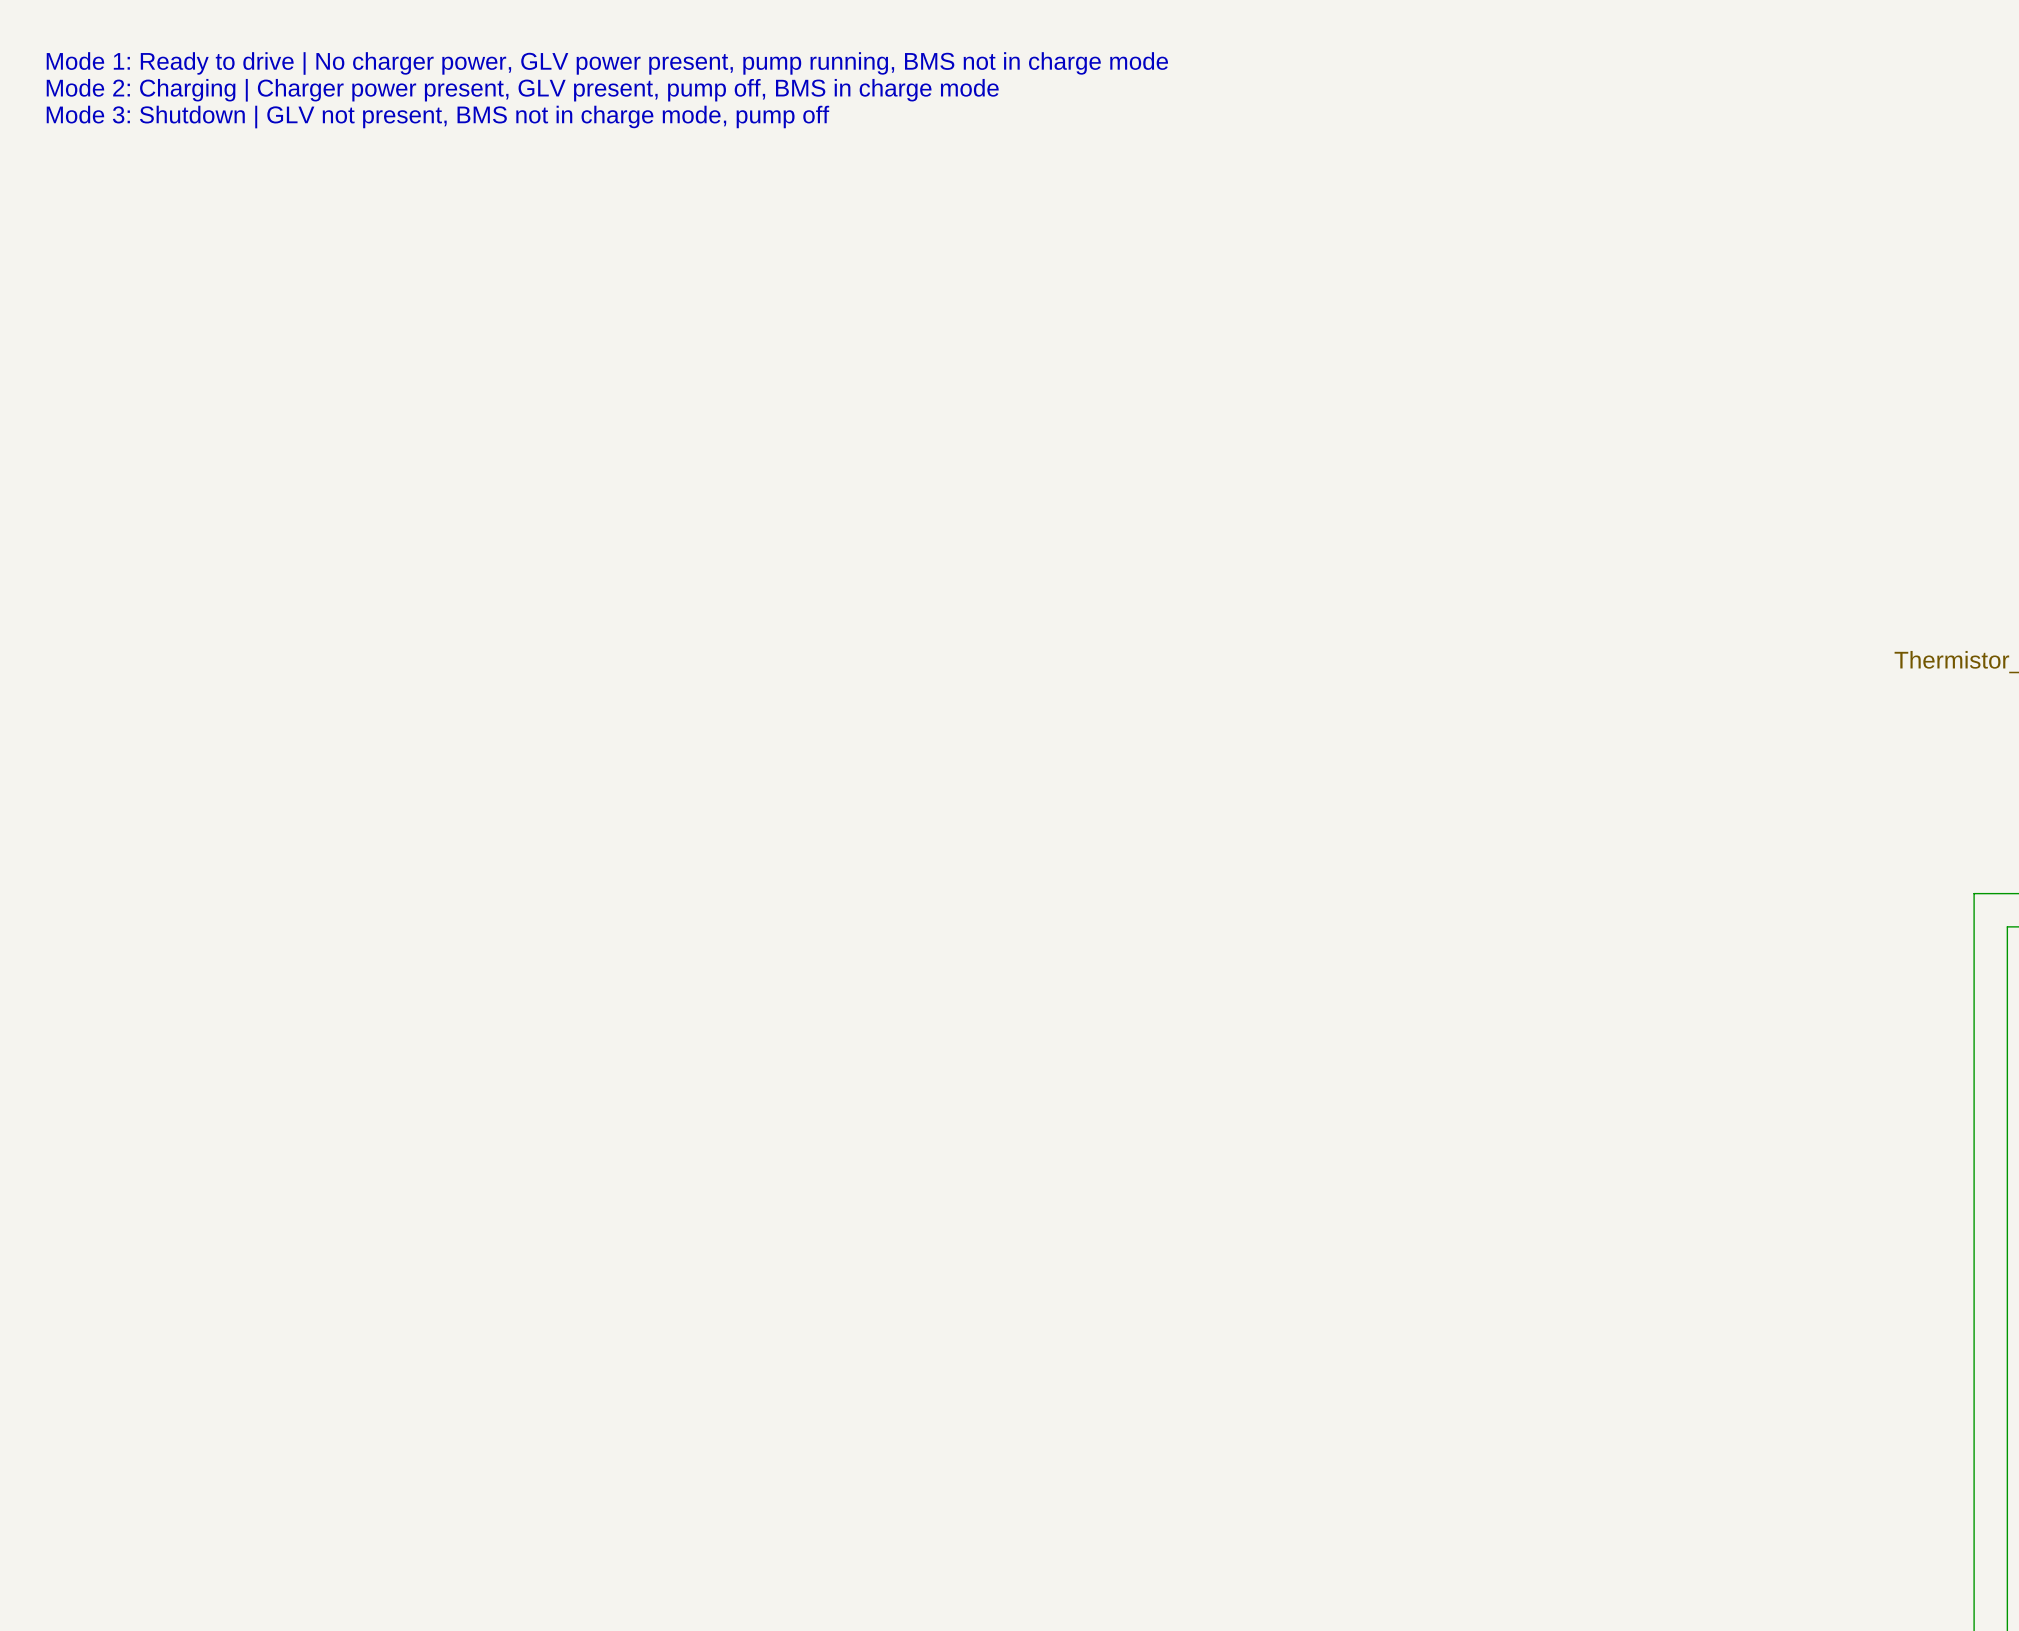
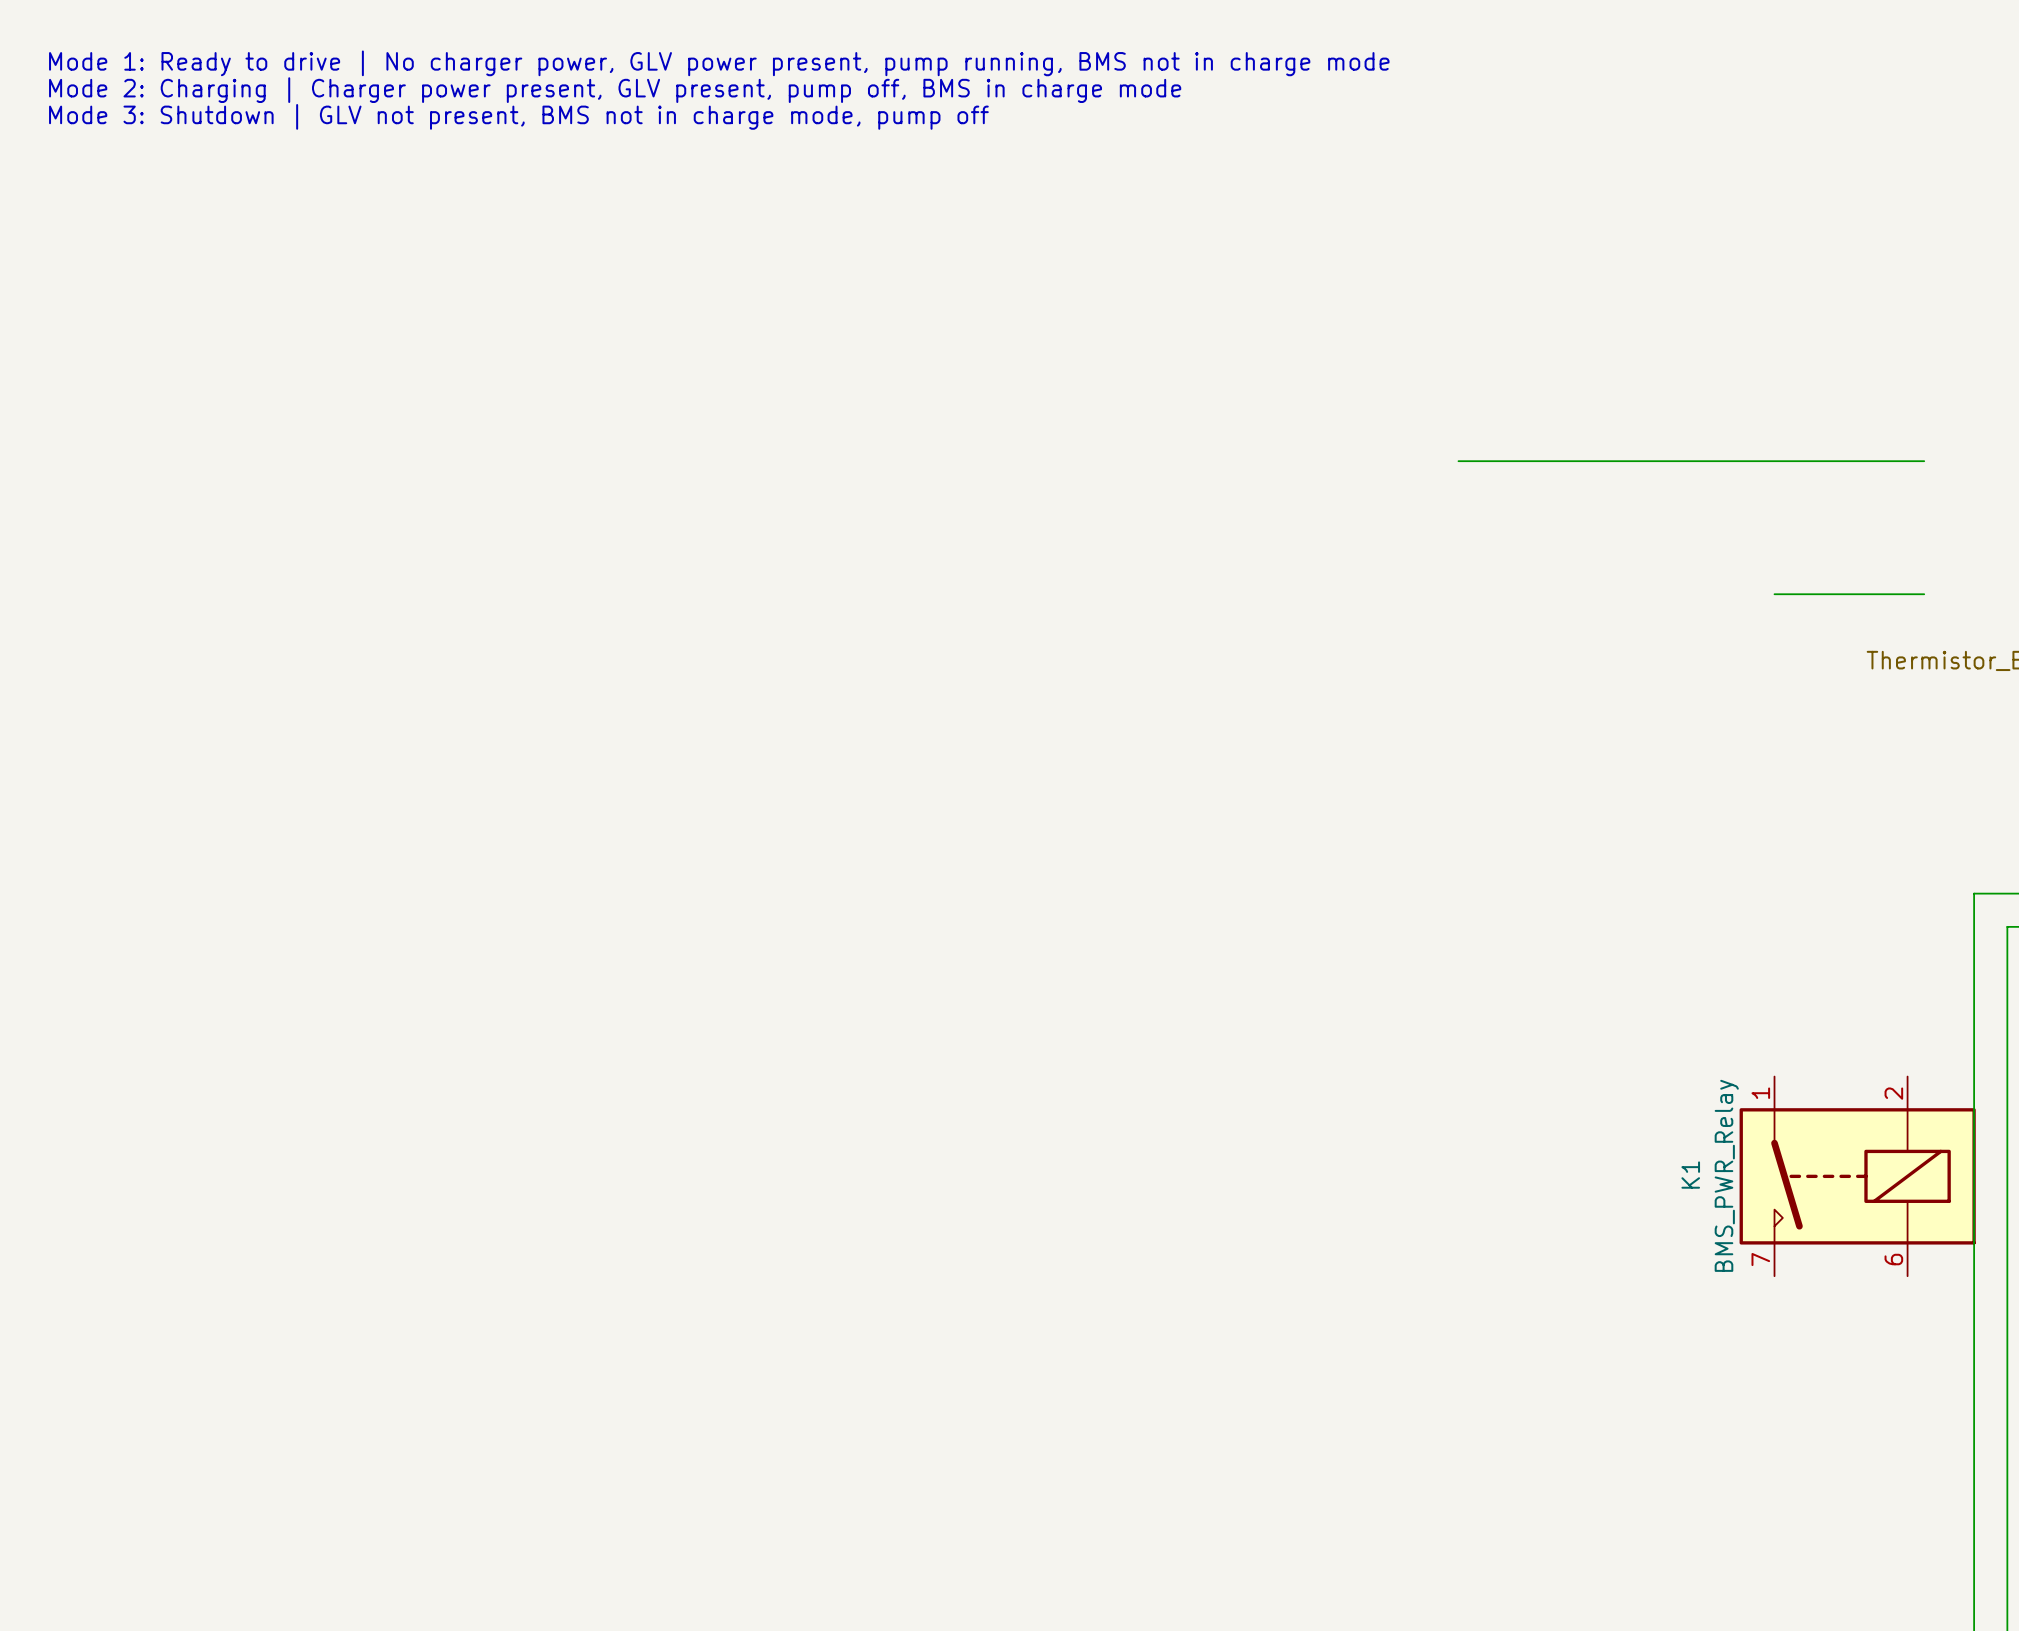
wire: none -> (1458, 461) (1924, 461)
wire: none -> (1774, 594) (1924, 594)
K1: none -> BMS_PWR_Relay (1857, 1176)

